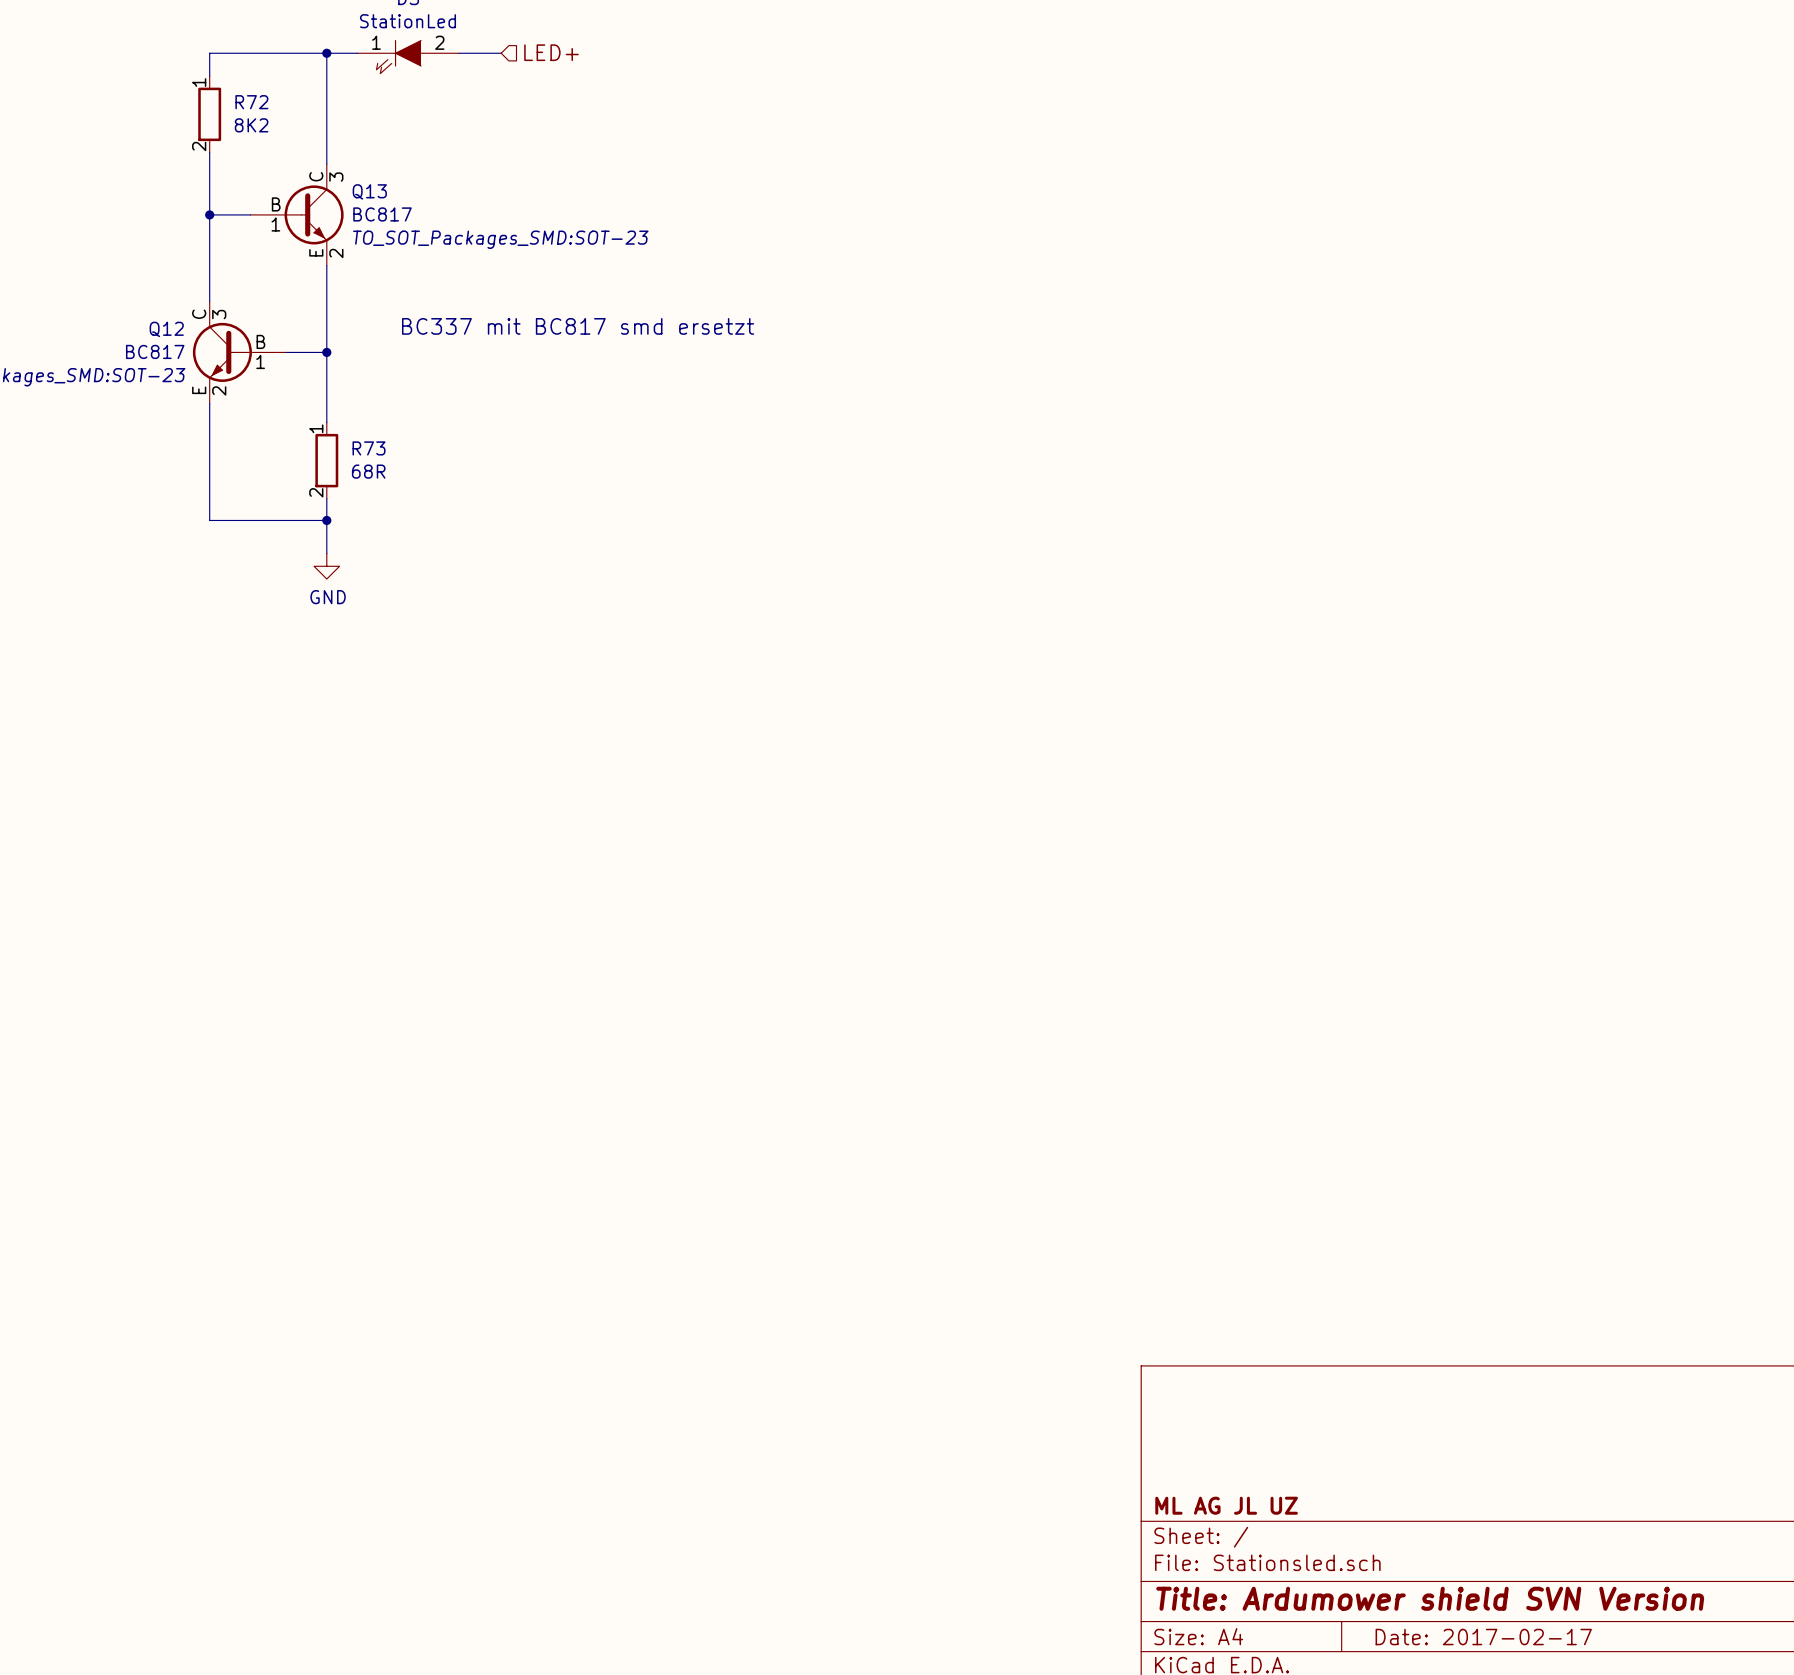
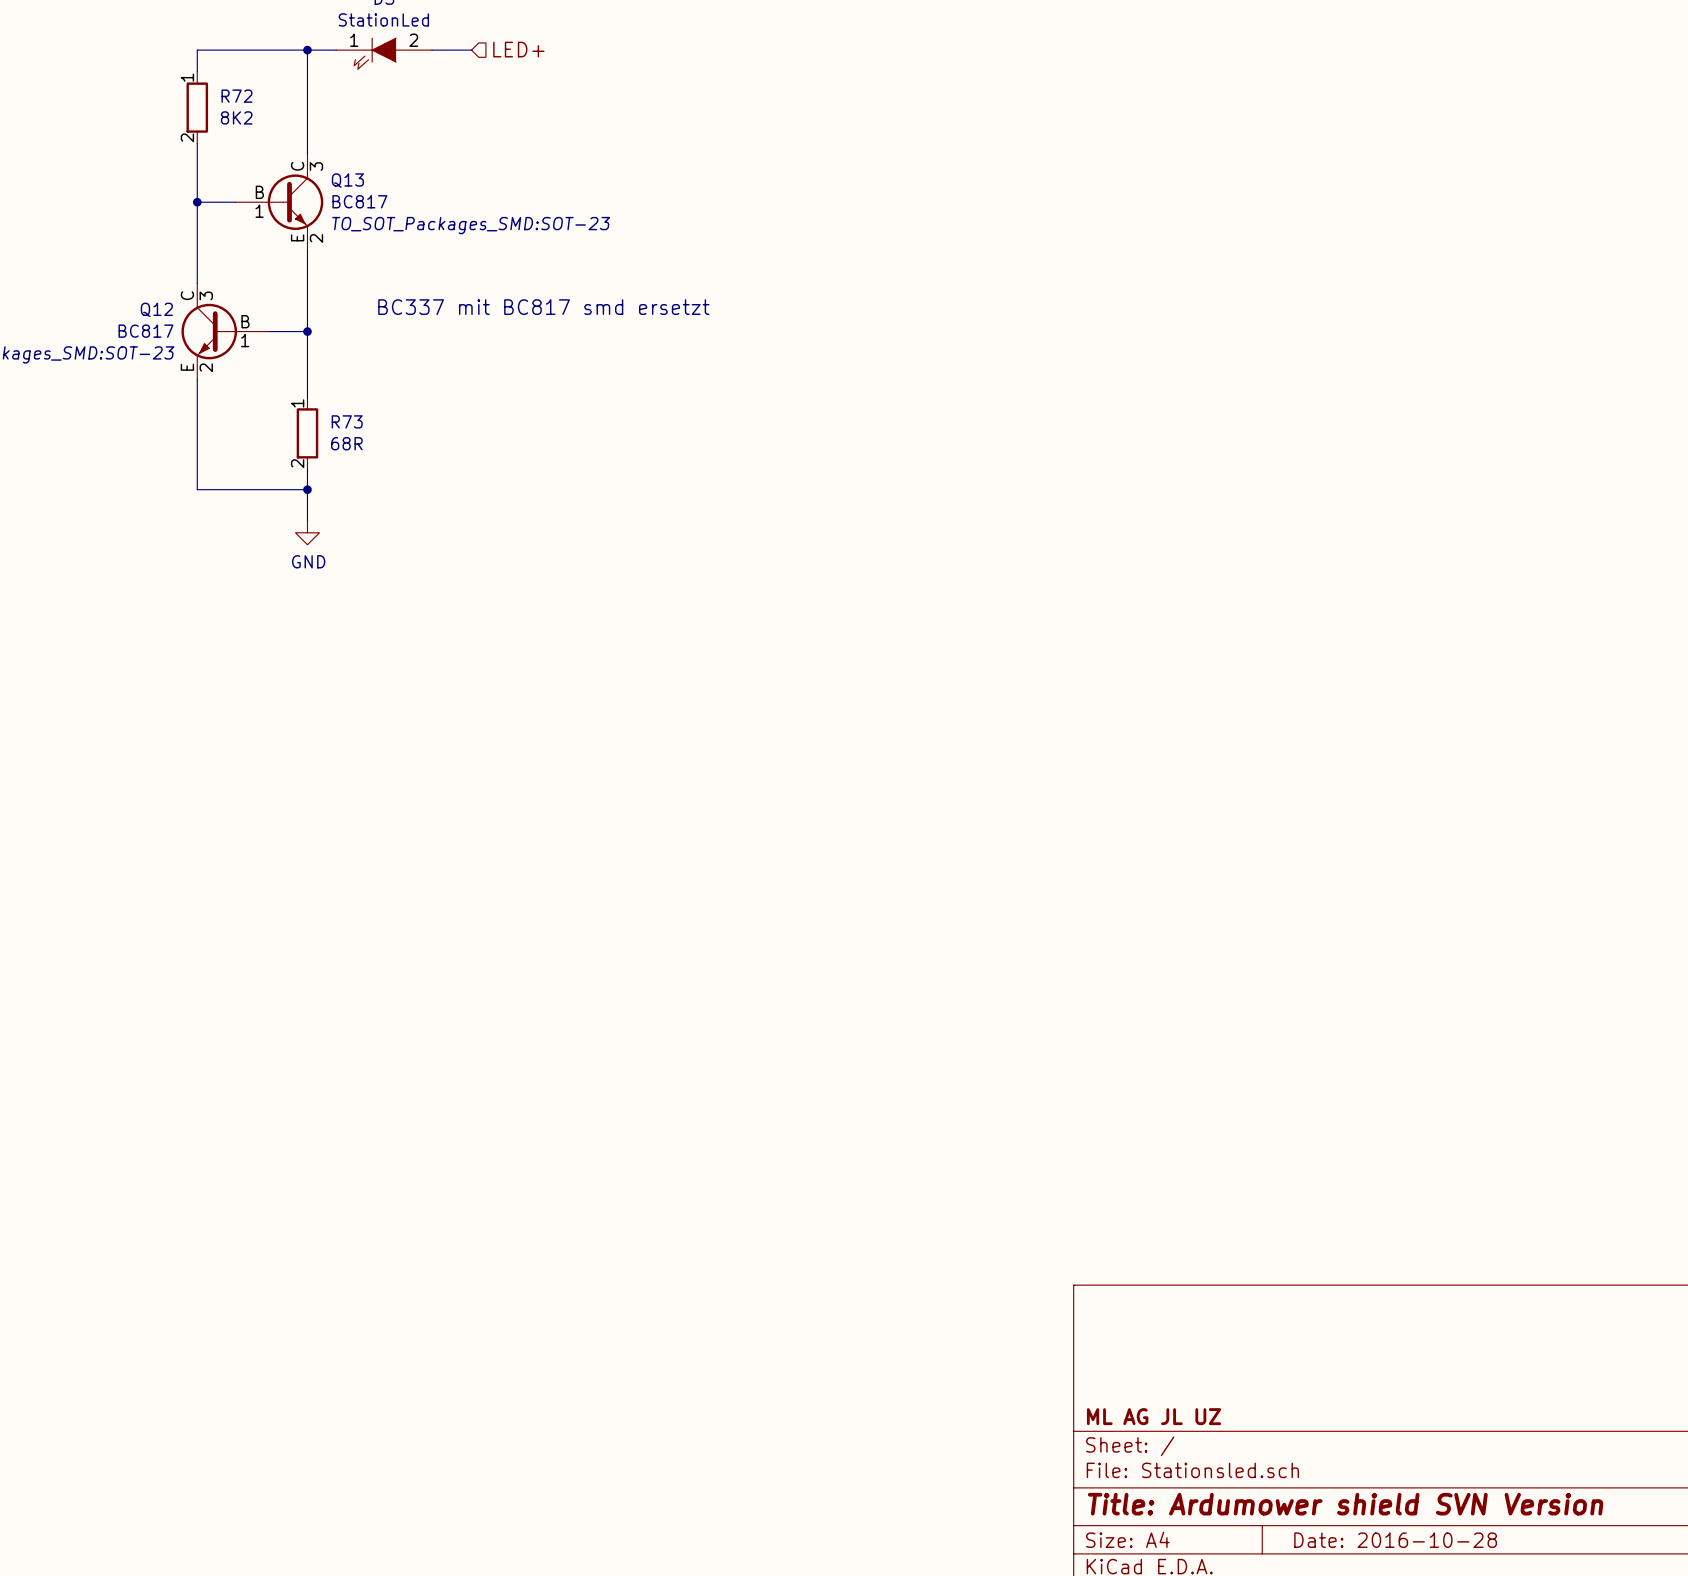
title block: Date: 2017-02-17 (1483, 1637) -> Date: 2016-10-28 (1395, 1540)

